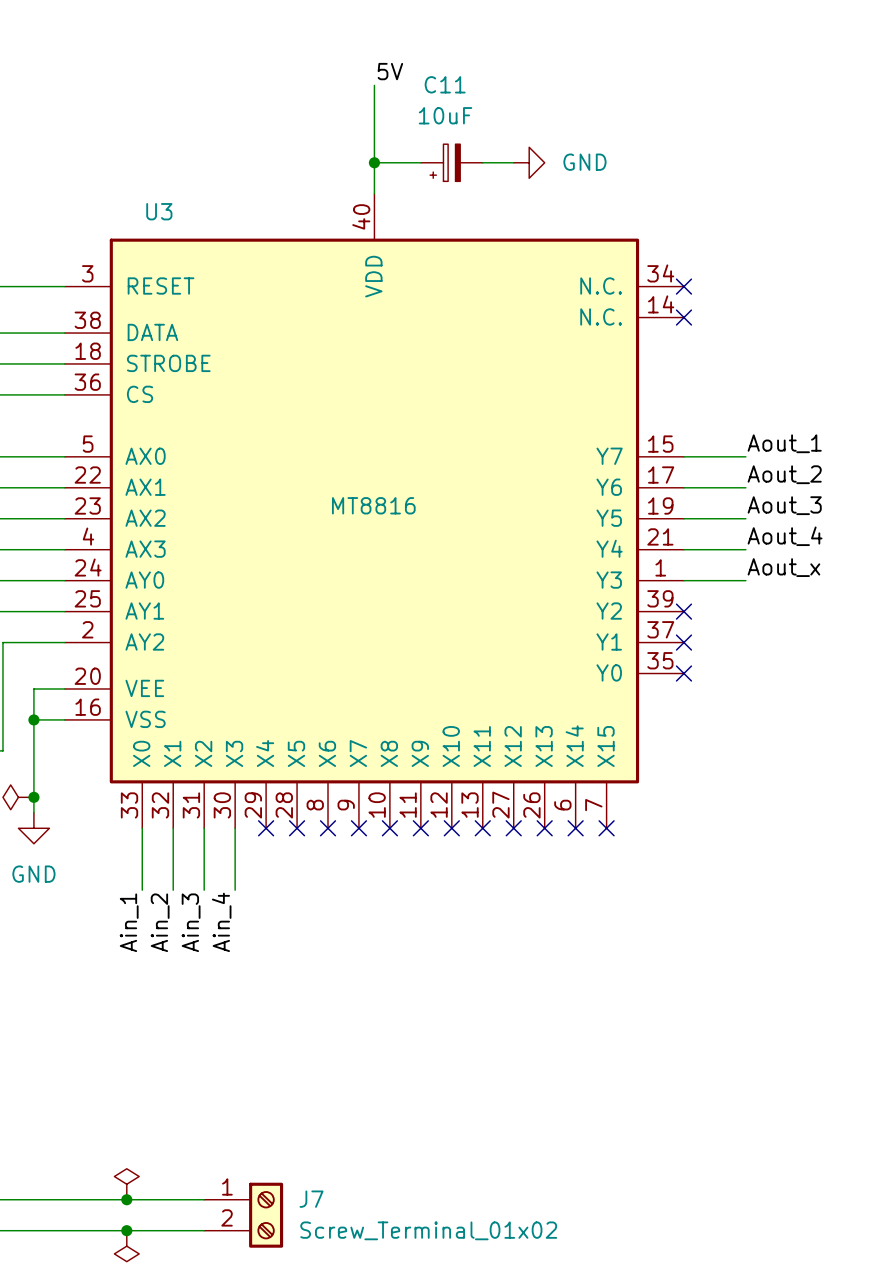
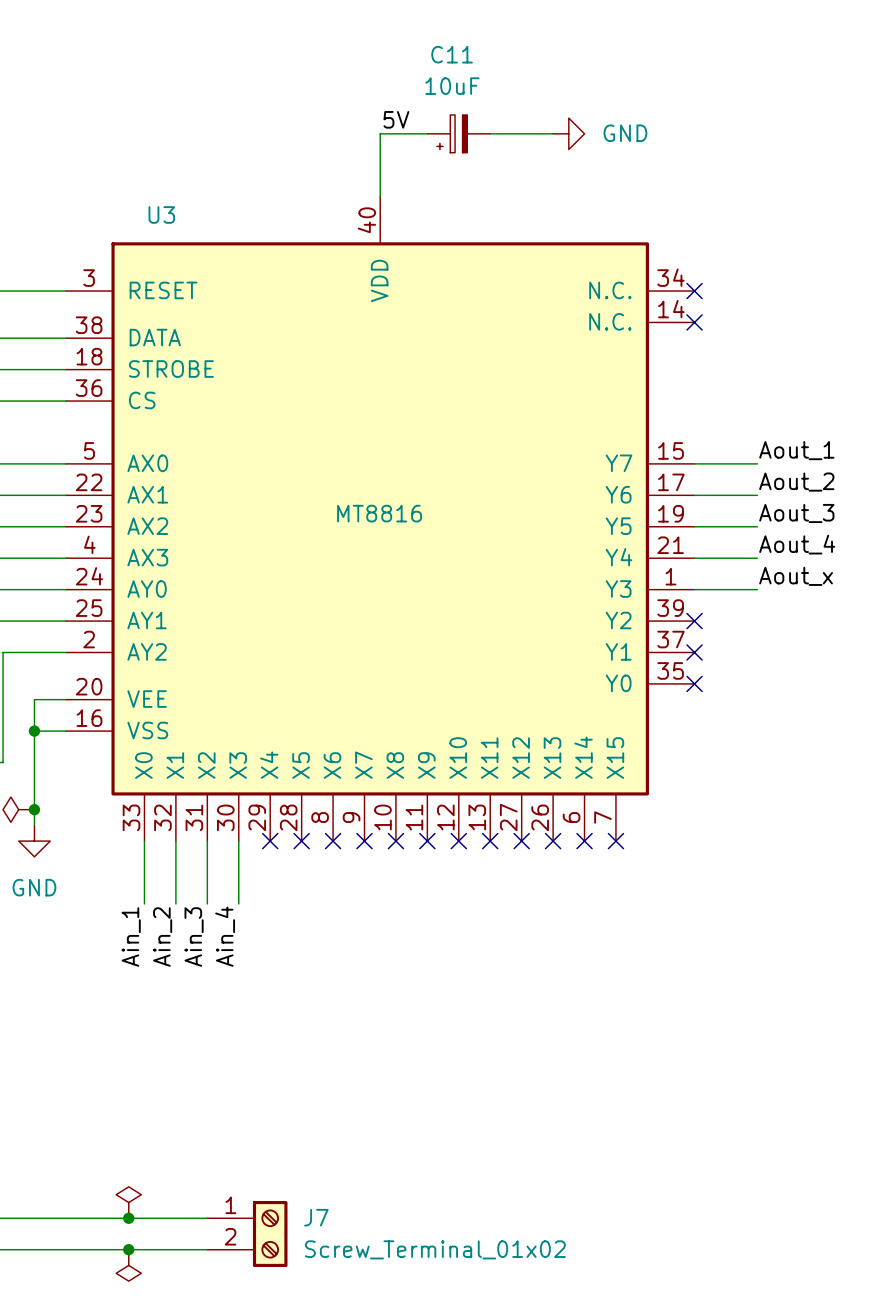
label position: 5V (390, 71) -> 5V (396, 119)
wire: (374, 85) (374, 131) -> (427, 133) (380, 133)
wire: none -> (490, 133) (553, 133)
wire: (374, 162) (420, 162) -> none
junction: (374, 162) -> none
C11 position: (451, 162) -> (458, 133)
wire: (482, 162) (513, 162) -> none
power symbol position: GND (529, 162) -> GND (568, 133)

